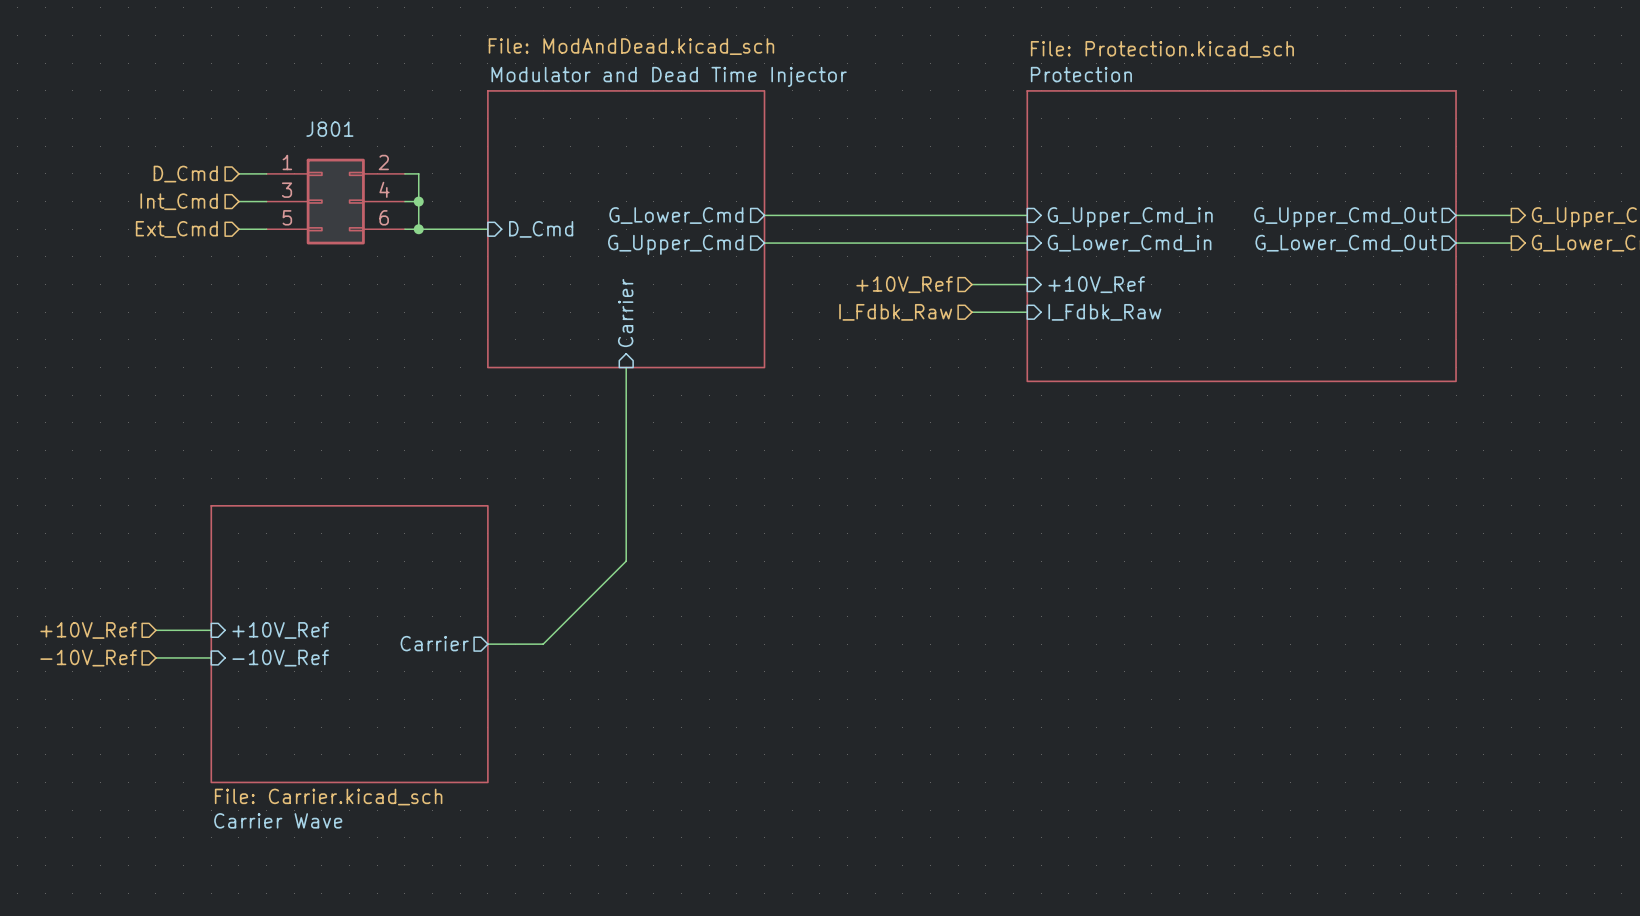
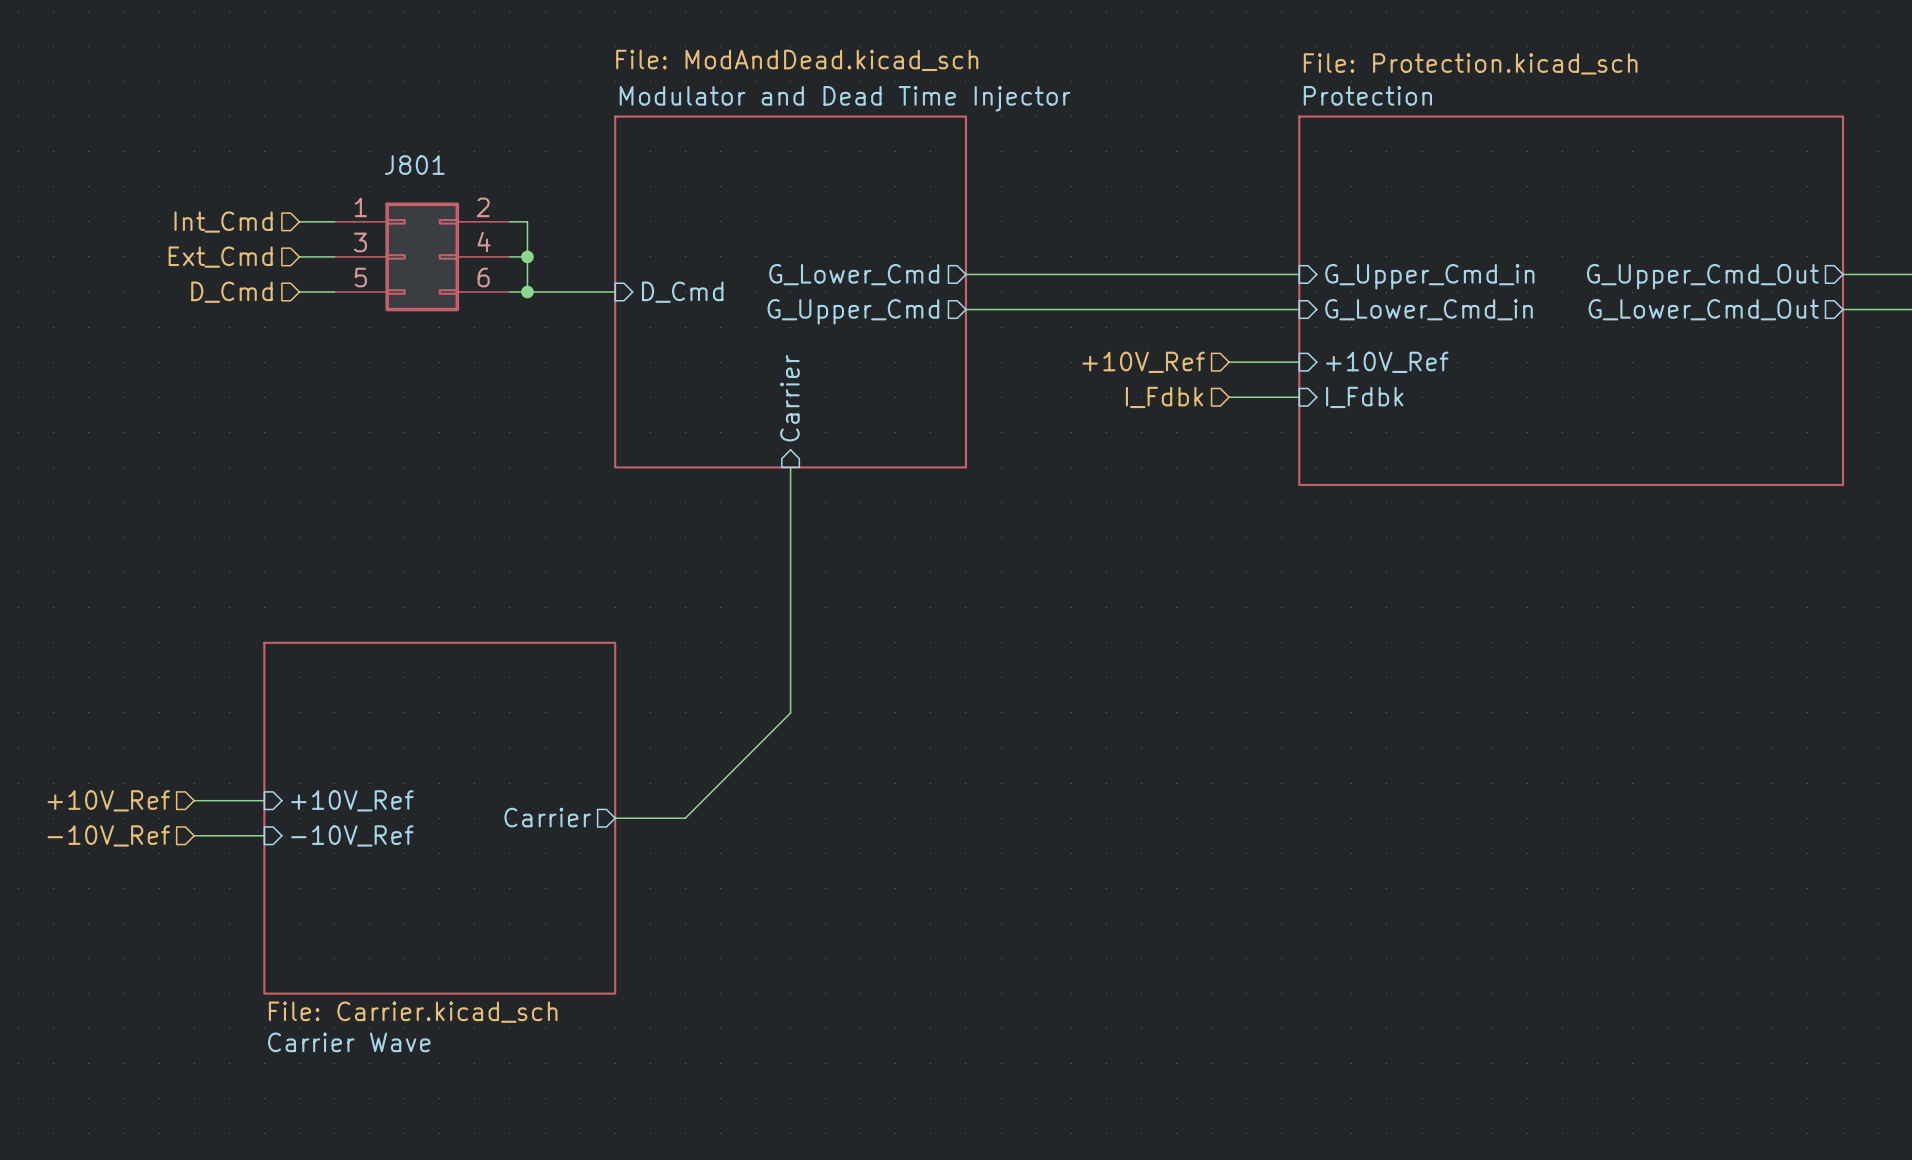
hierarchical label: D_Cmd (185, 174) -> Int_Cmd (223, 222)
hierarchical label: Int_Cmd (179, 201) -> Ext_Cmd (220, 257)
hierarchical label: Ext_Cmd (176, 229) -> D_Cmd (231, 292)
hierarchical label: I_Fdbk_Raw (895, 312) -> I_Fdbk (1164, 397)
sheet pin: I_Fdbk_Raw (1104, 312) -> I_Fdbk (1364, 397)

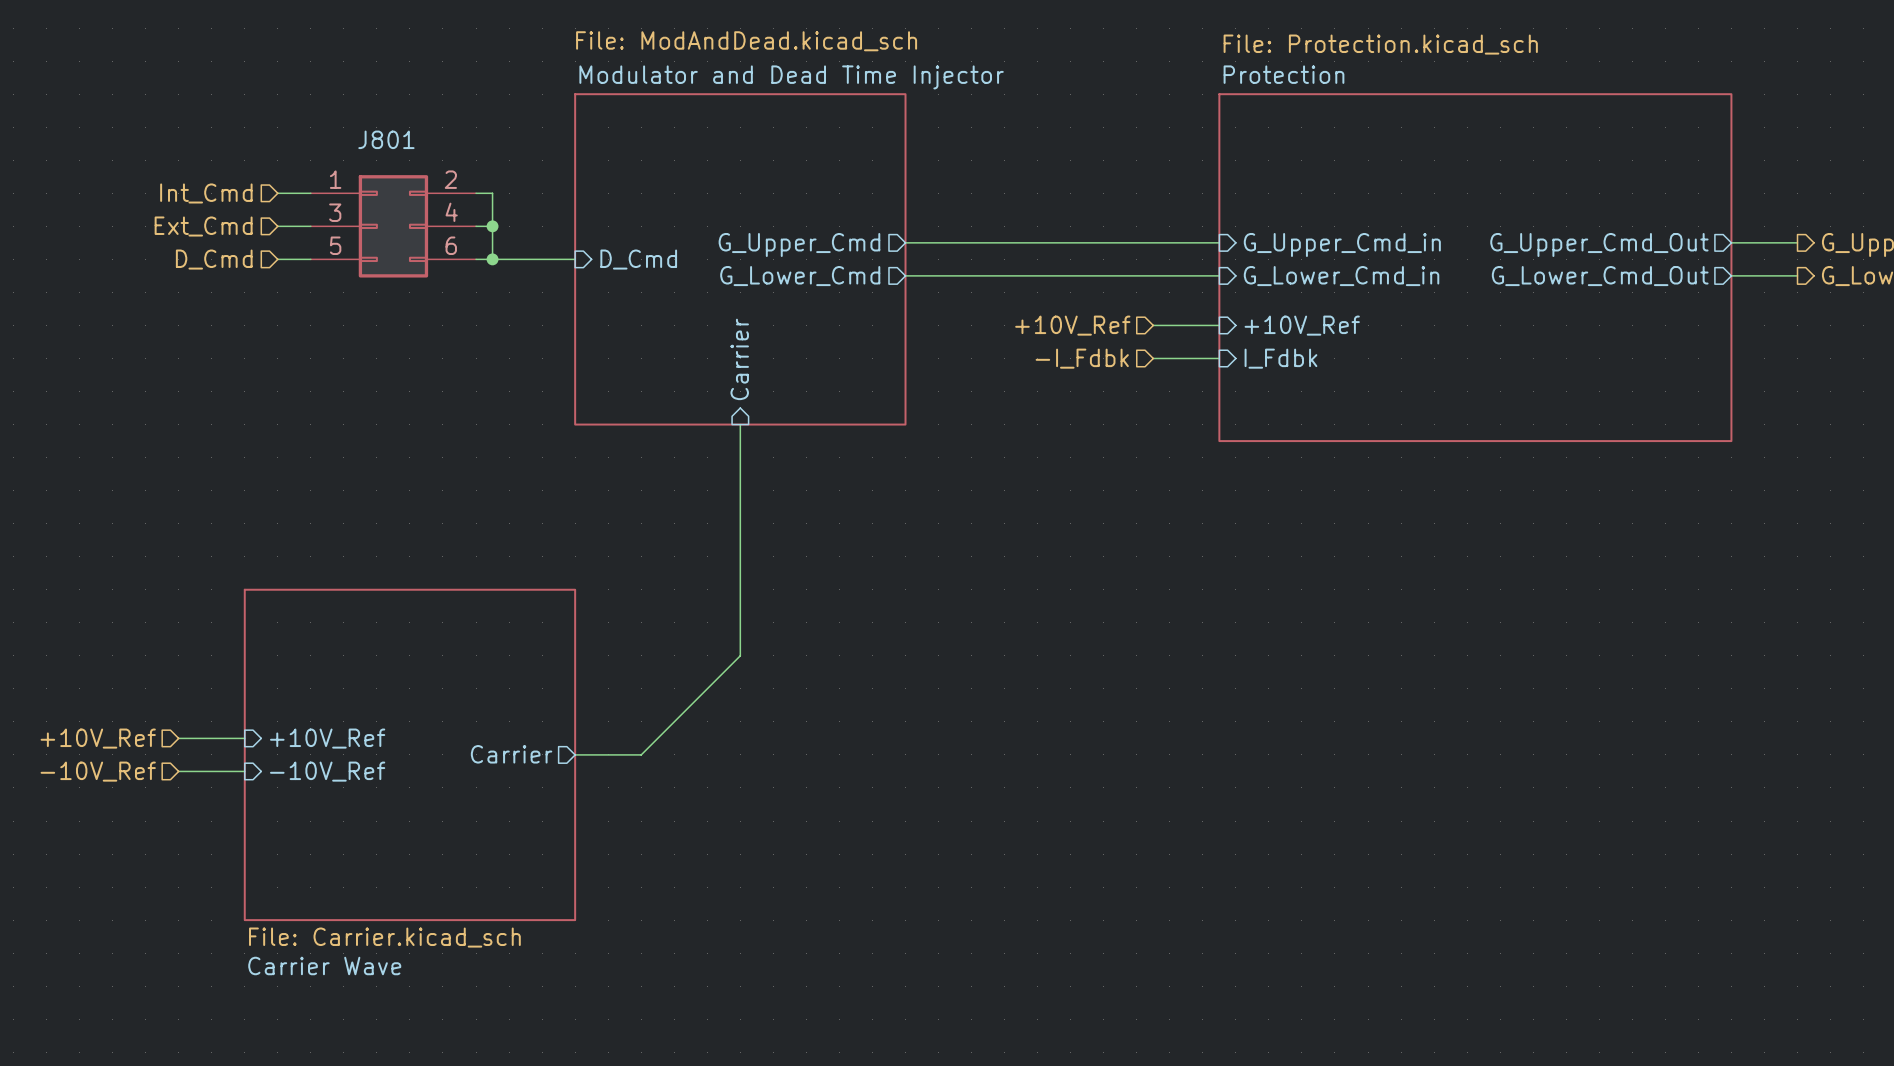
sheet pin: G_Lower_Cmd (854, 274) -> G_Upper_Cmd (799, 244)
sheet pin: G_Upper_Cmd (853, 311) -> G_Lower_Cmd (800, 276)
hierarchical label: I_Fdbk (1164, 397) -> -I_Fdbk (1082, 358)

